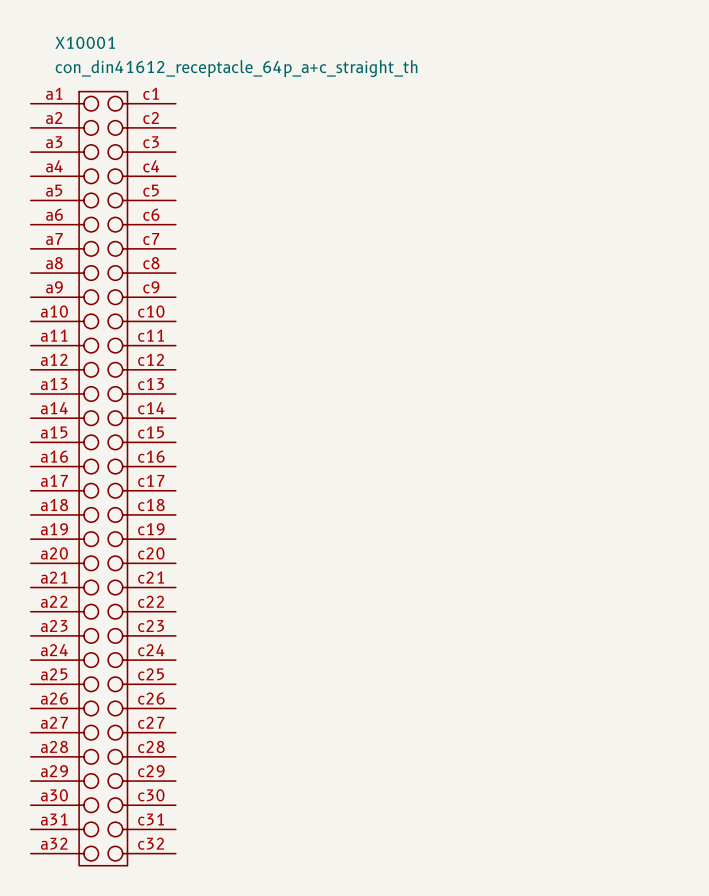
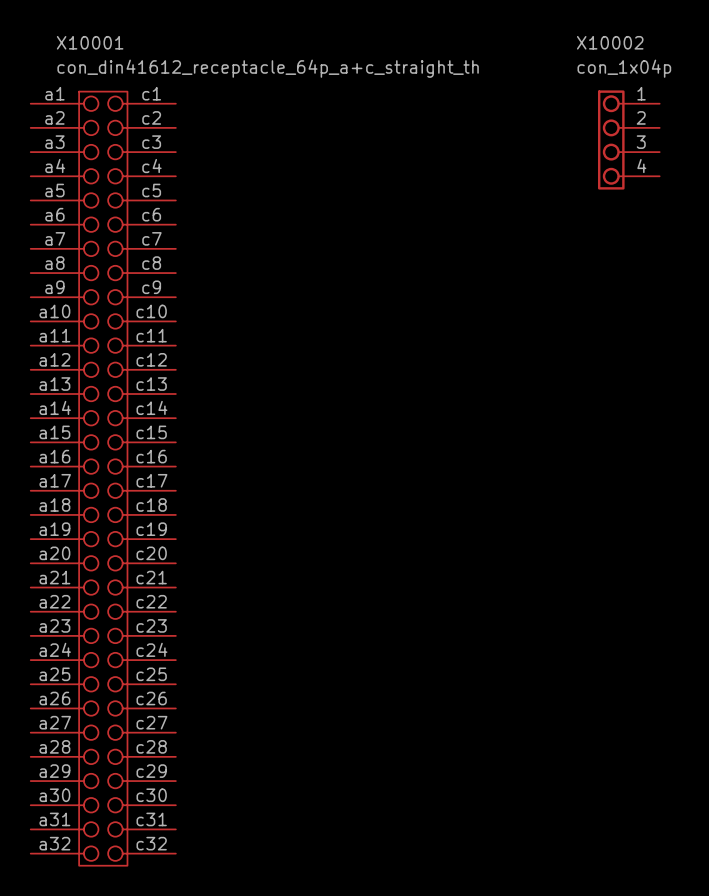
X10002: none -> con_1x04p (628, 140)

